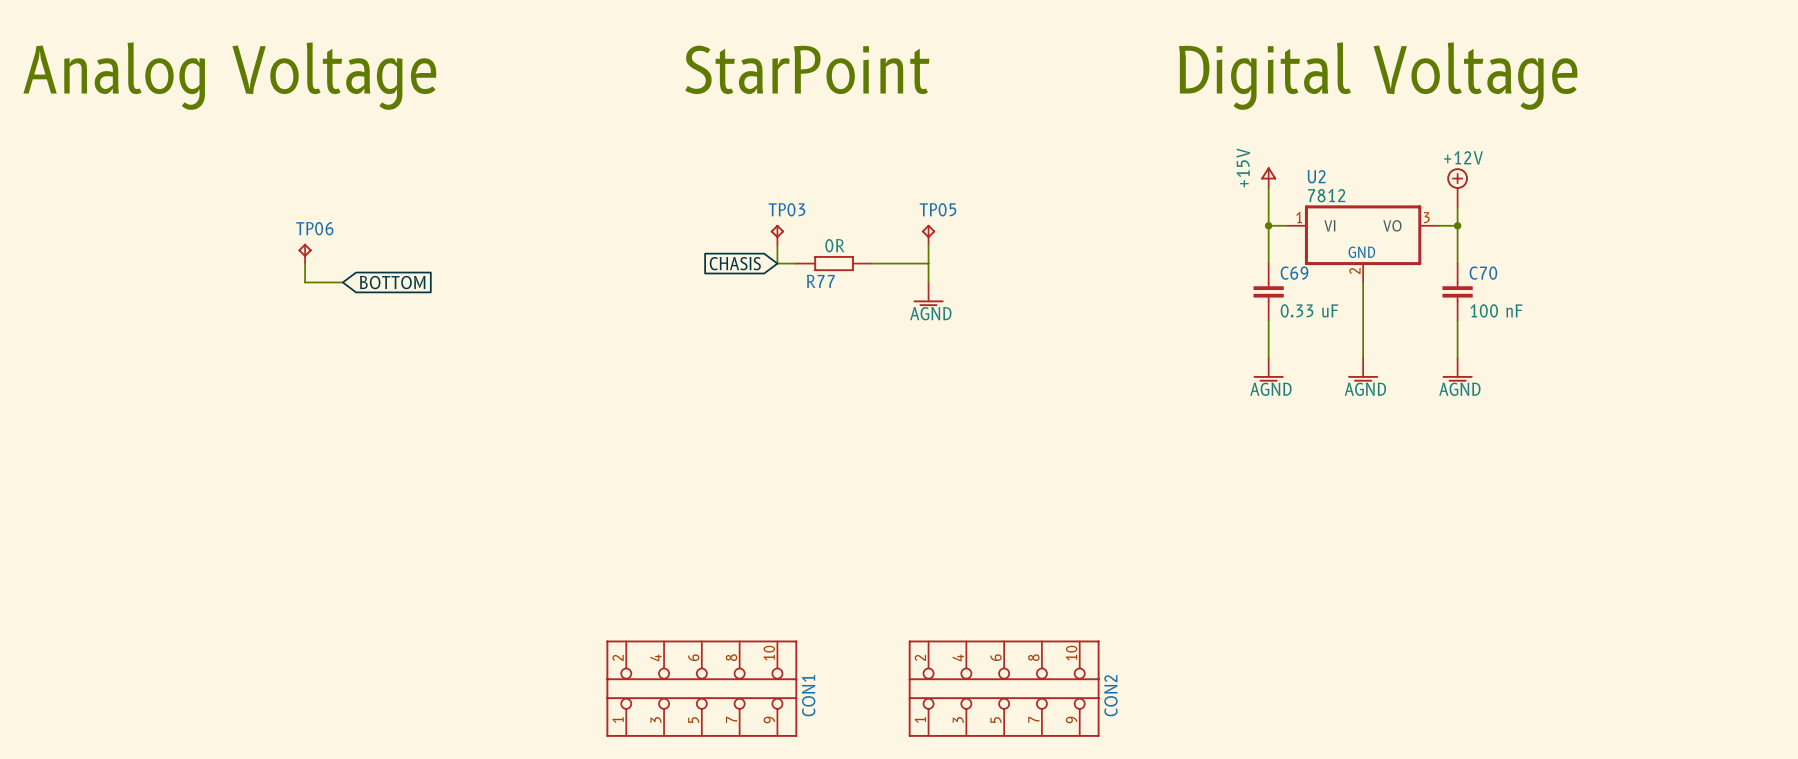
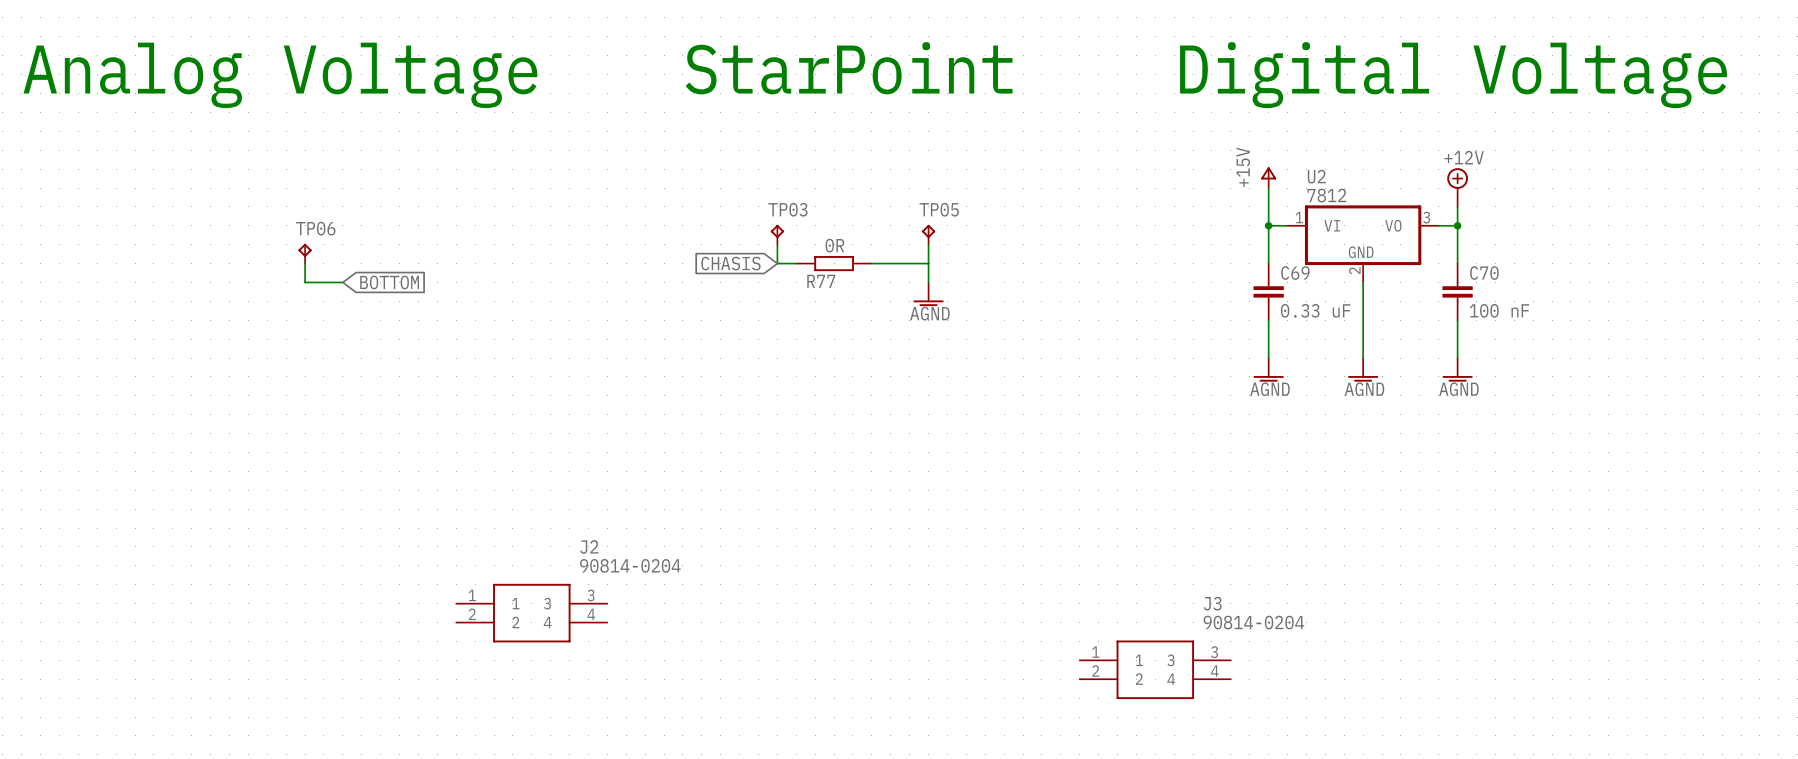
J2: none -> 90814-0204 (531, 613)
J3: none -> 90814-0204 (1155, 669)
CON1: (701, 688) -> none
CON2: (1004, 688) -> none

